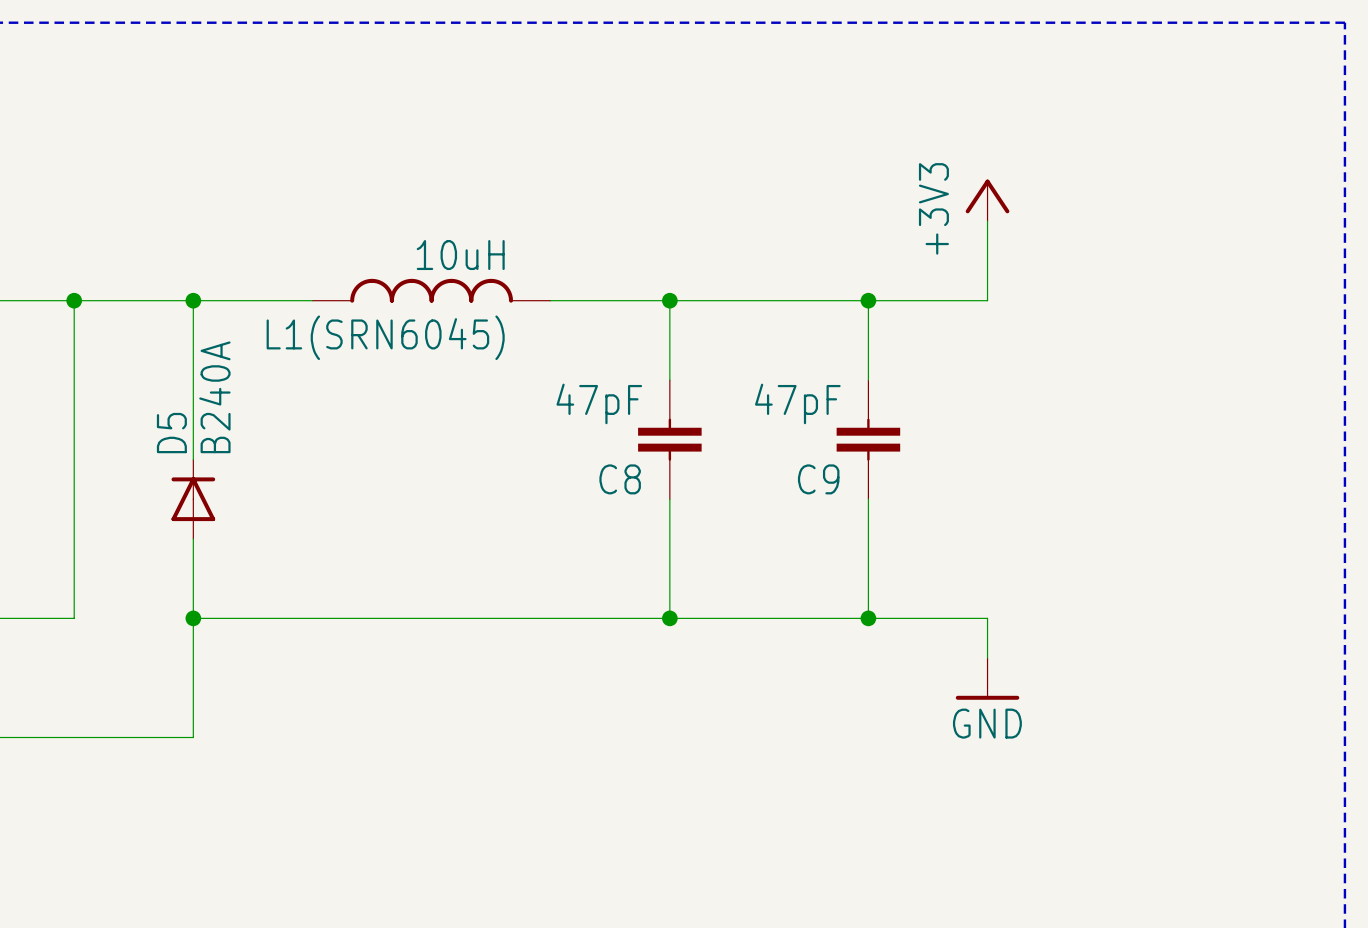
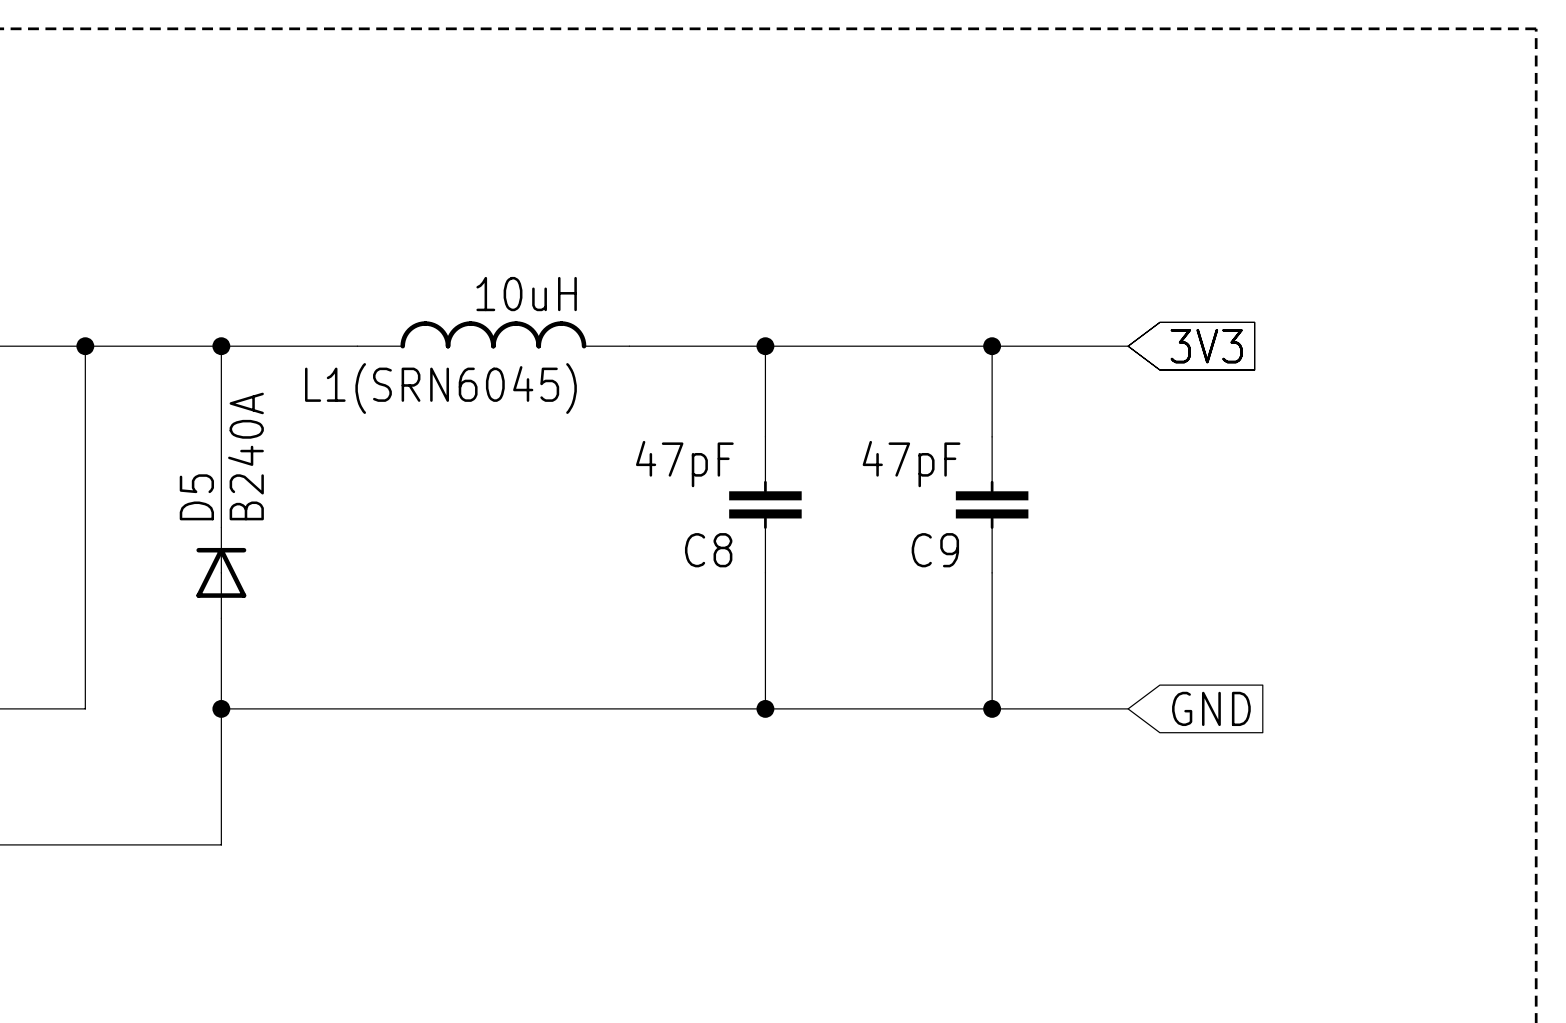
power symbol: +3V3 (987, 200) -> none
wire: (987, 221) (987, 300) -> none
global label: none -> 3V3 (1206, 346)
wire: (987, 618) (987, 658) -> none
global label: none -> GND (1211, 708)
power symbol: GND (987, 678) -> none

